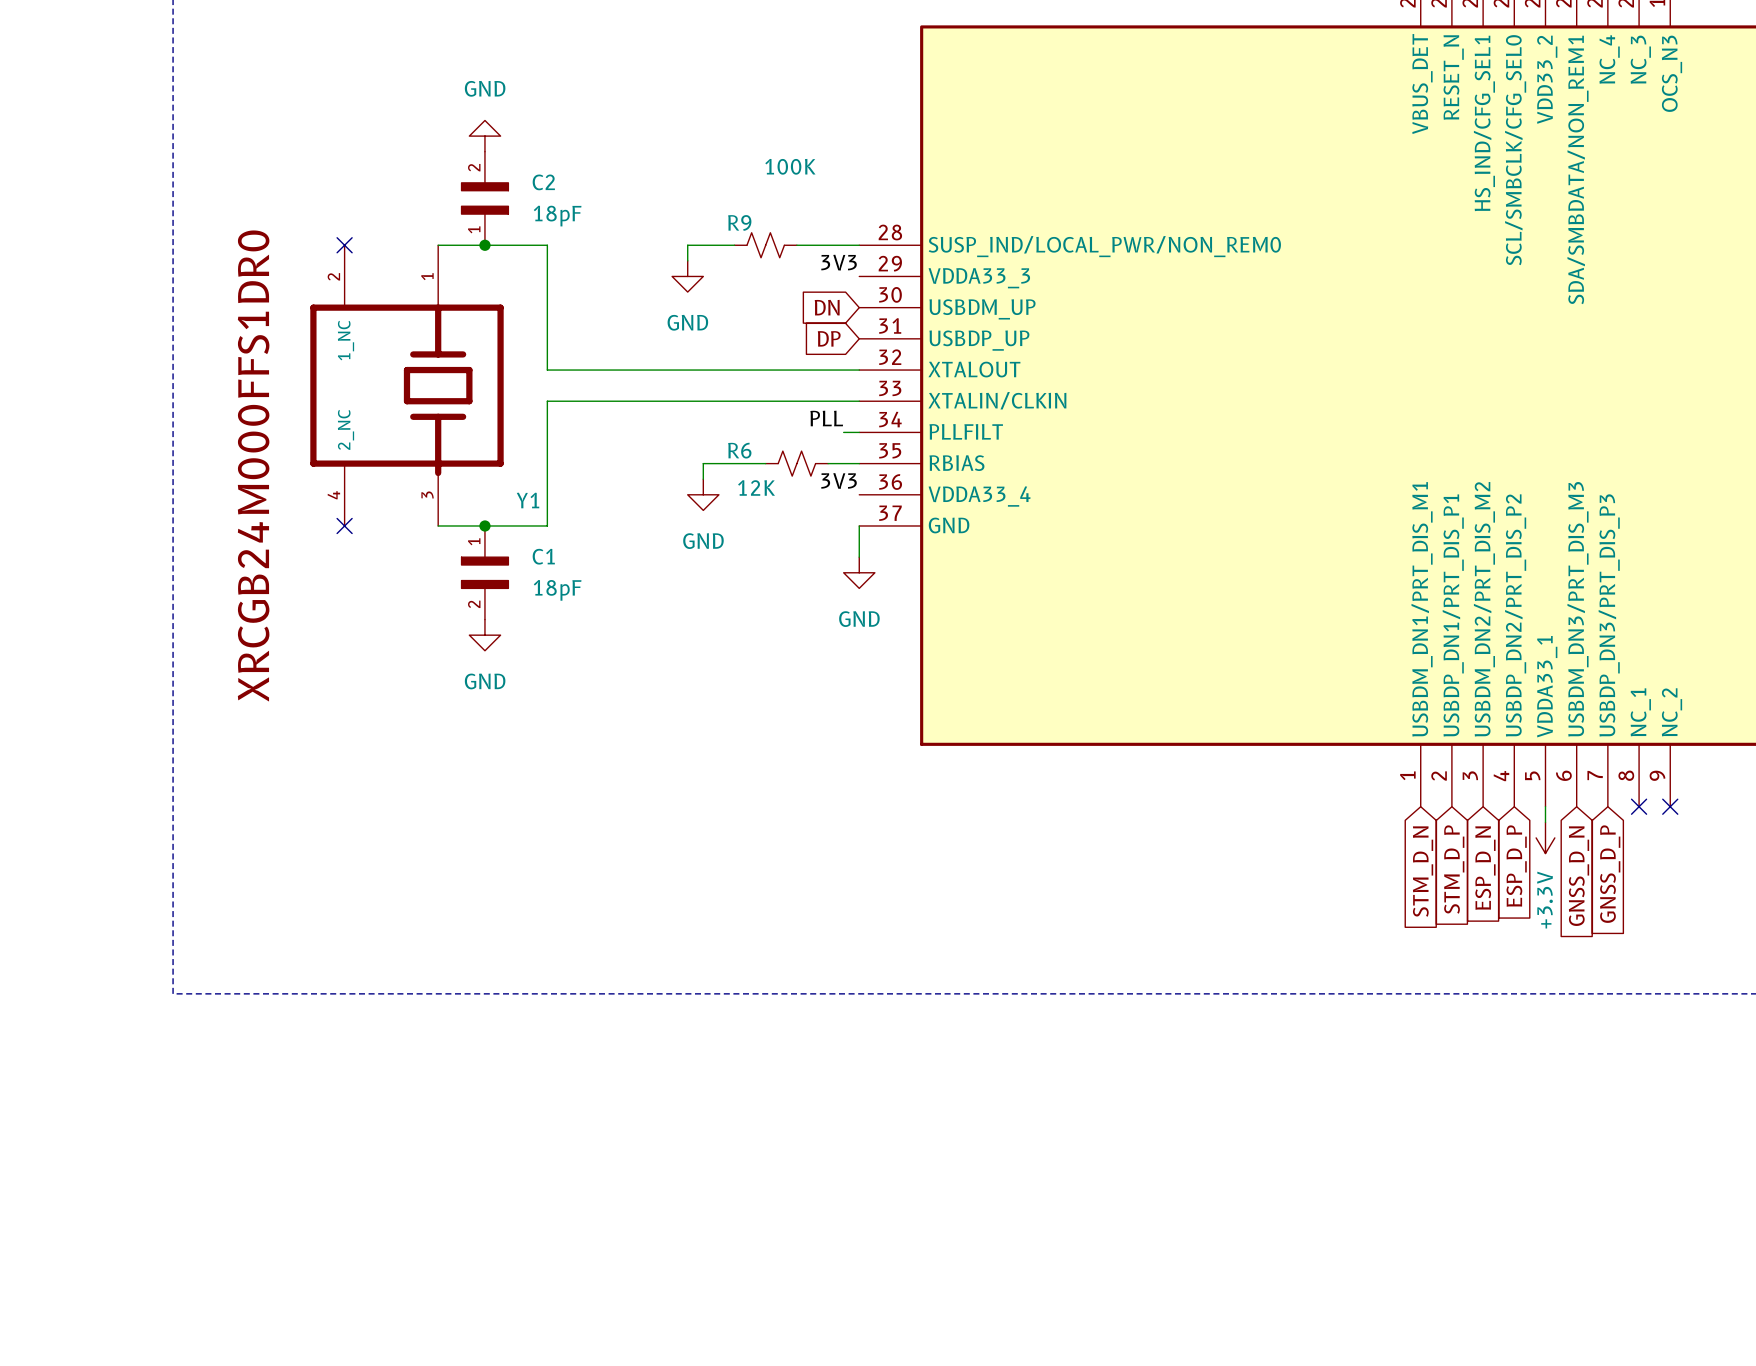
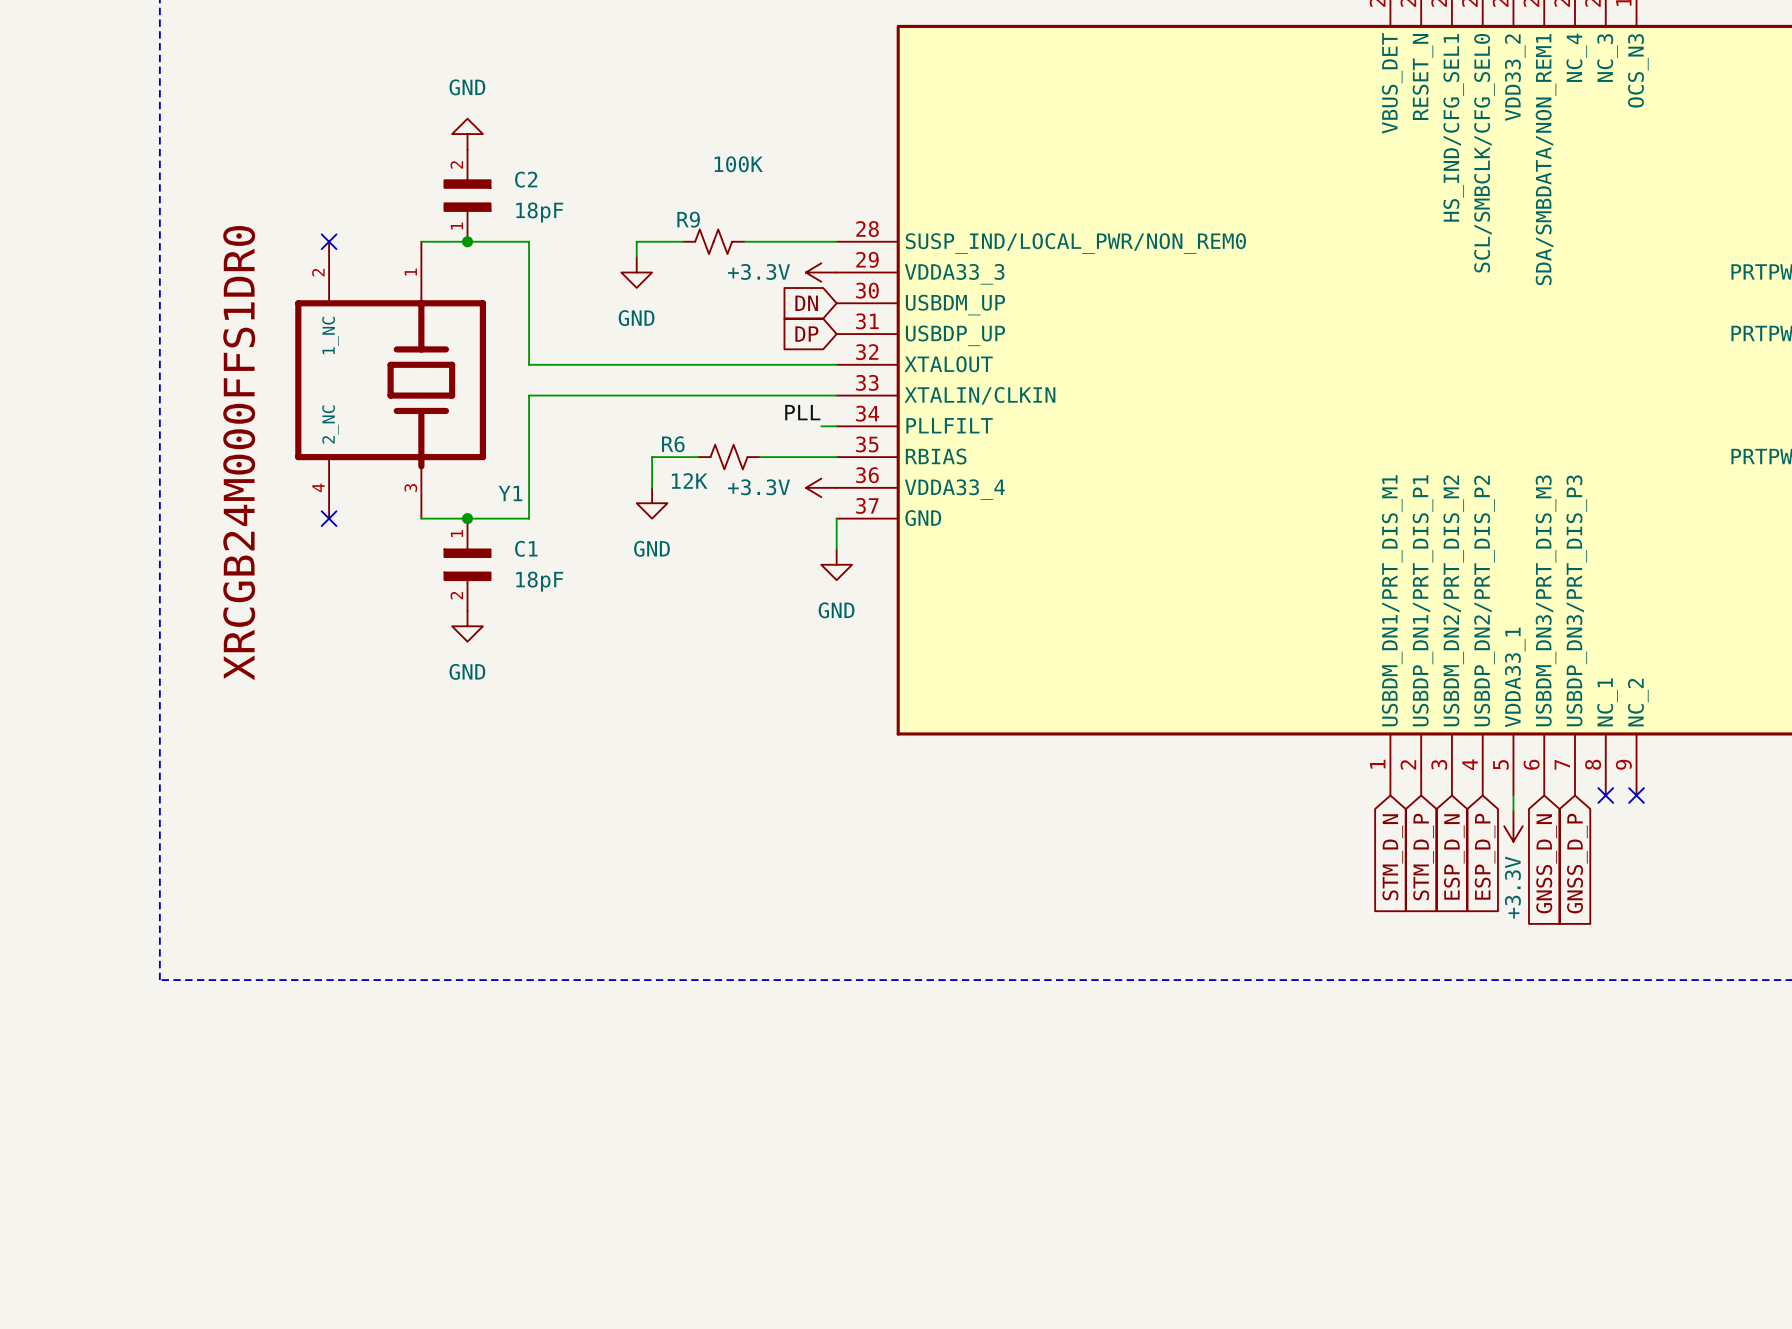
wire: (687, 245) (687, 260) -> (667, 241) (636, 241) (636, 257)
R9 position: (765, 245) -> (713, 241)
label: 3V3 (839, 262) -> none
power symbol position: GND (687, 276) -> GND (636, 272)
power symbol: none -> +3.3V (821, 272)
wire: (703, 463) (703, 479) -> (682, 457) (652, 457) (652, 487)
wire: (718, 463) (765, 463) -> (759, 457) (805, 457)
R6 position: (796, 463) -> (729, 457)
label: 3V3 (839, 480) -> none
power symbol position: GND (703, 494) -> GND (652, 503)
power symbol: none -> +3.3V (821, 487)

